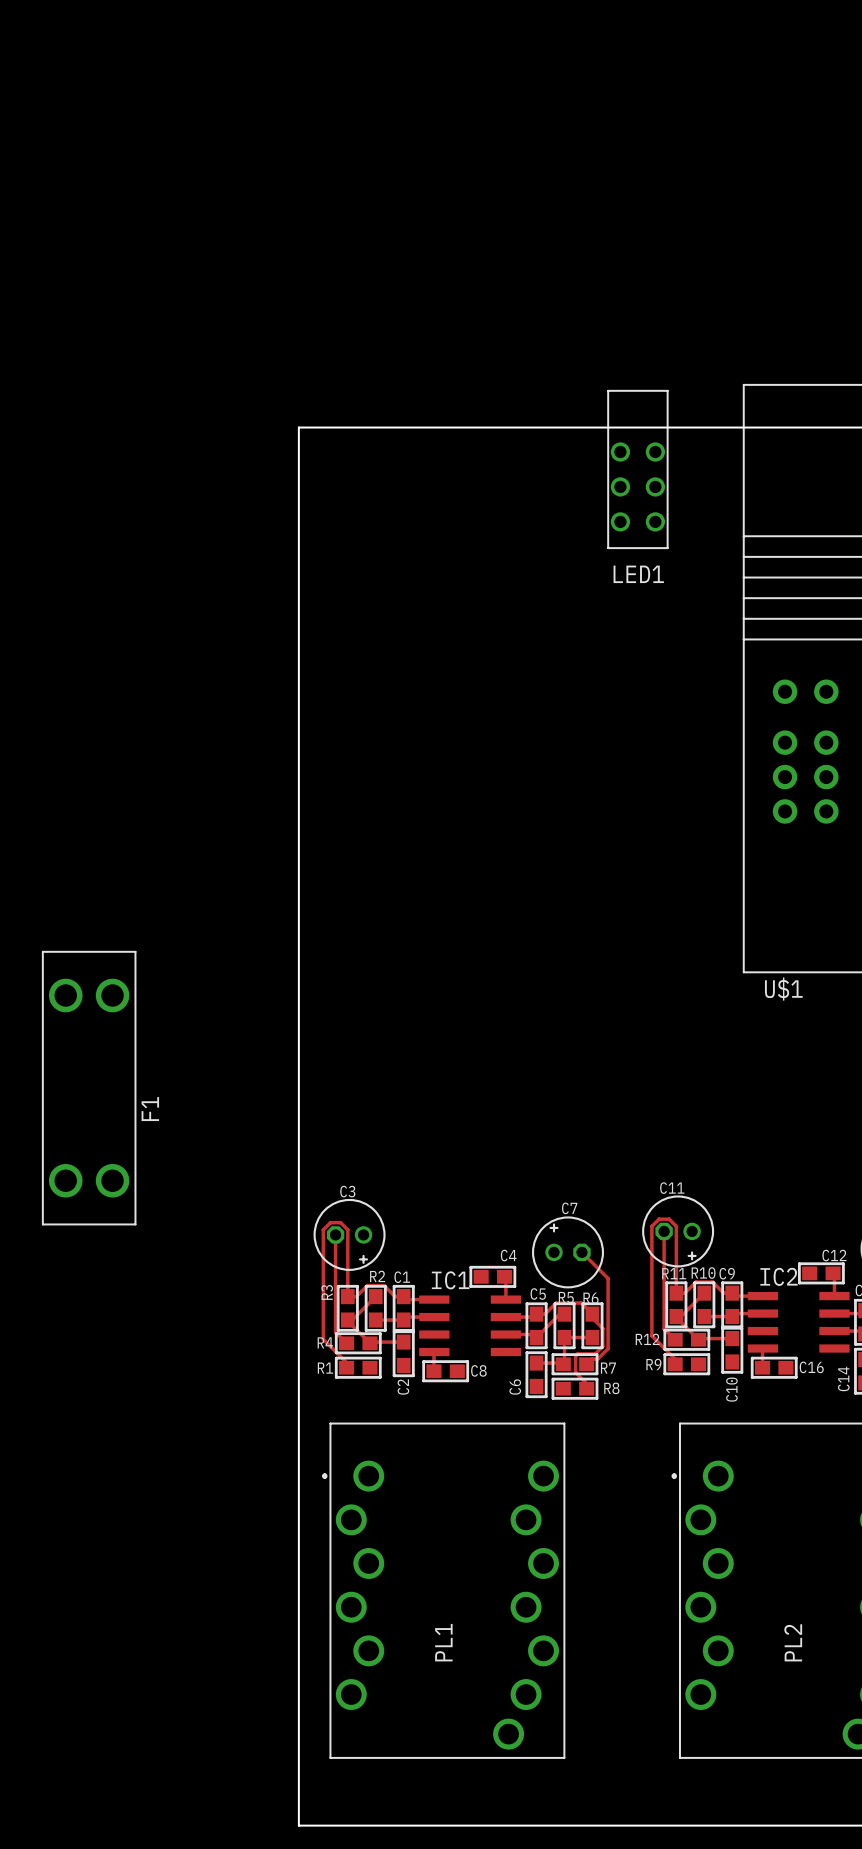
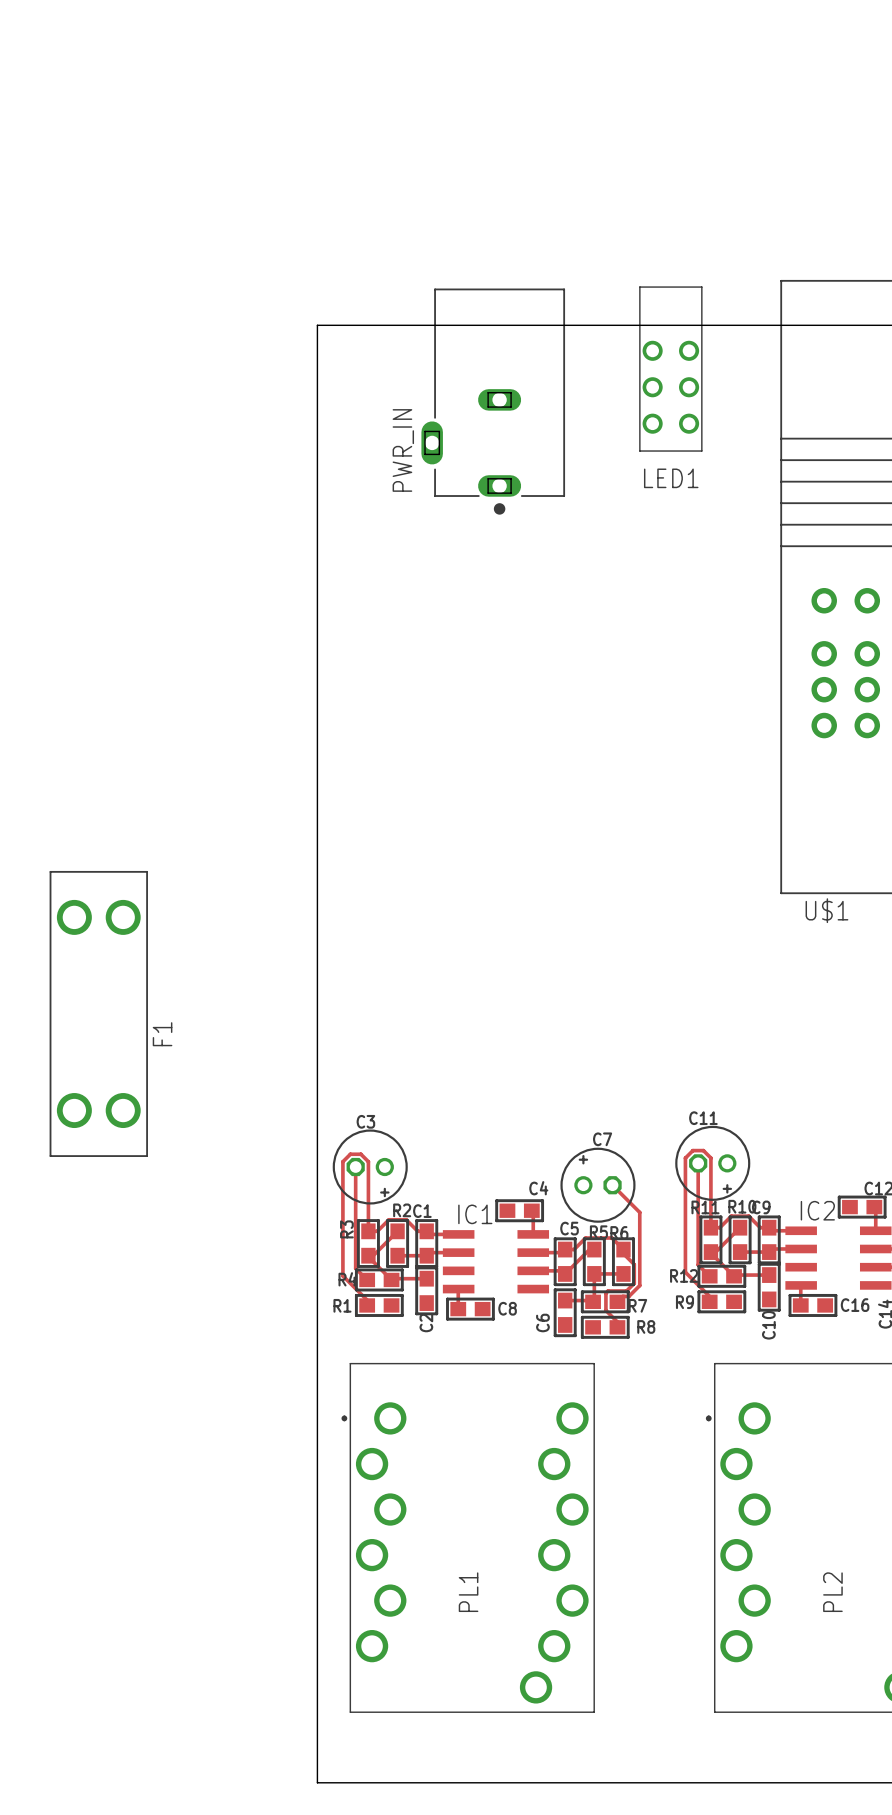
PWR_IN: none -> (493, 401)

